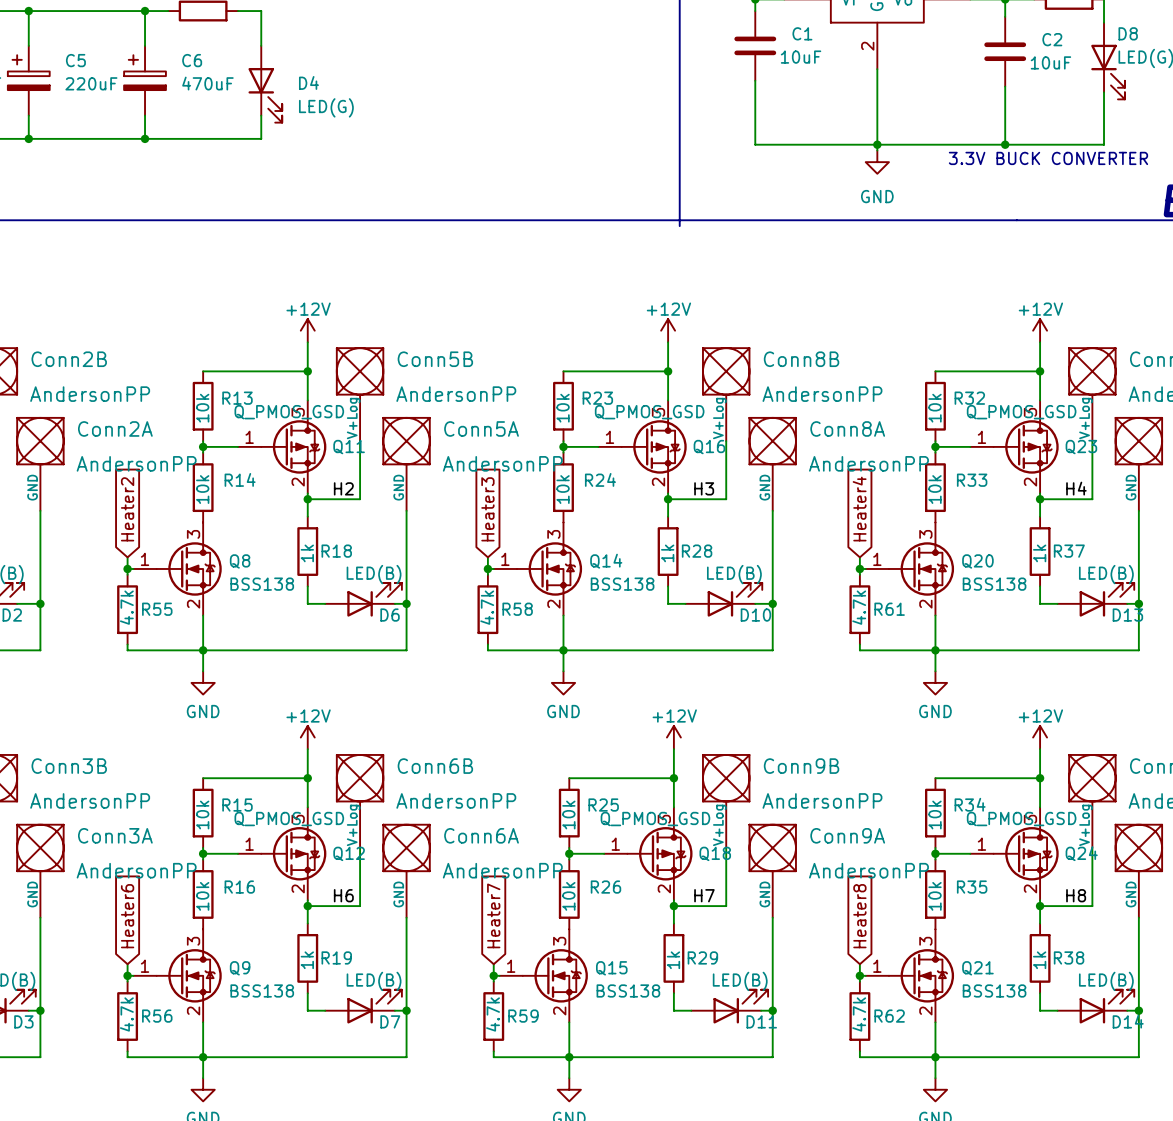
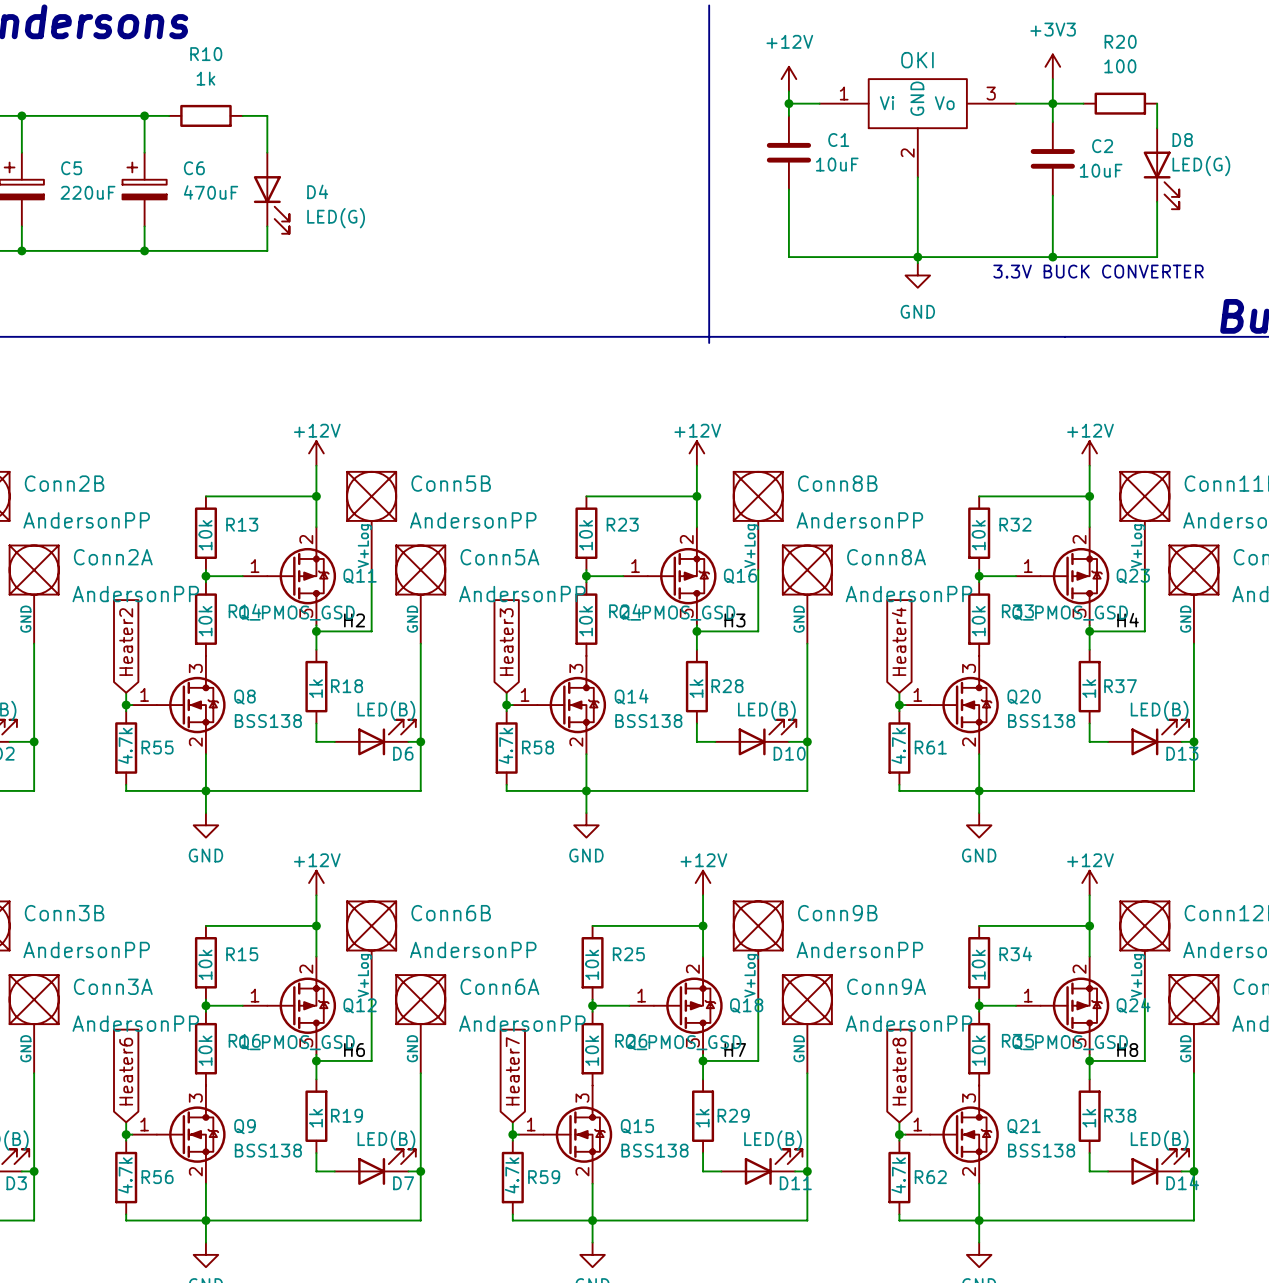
Q11 flip: as is (293, 446) -> up-down (301, 576)
Q16 flip: as is (654, 446) -> up-down (682, 576)
Q23 flip: as is (1026, 446) -> up-down (1074, 576)
Q12 flip: as is (293, 853) -> up-down (301, 1005)
Q18 flip: as is (659, 853) -> up-down (688, 1005)
Q24 flip: as is (1026, 853) -> up-down (1074, 1005)

